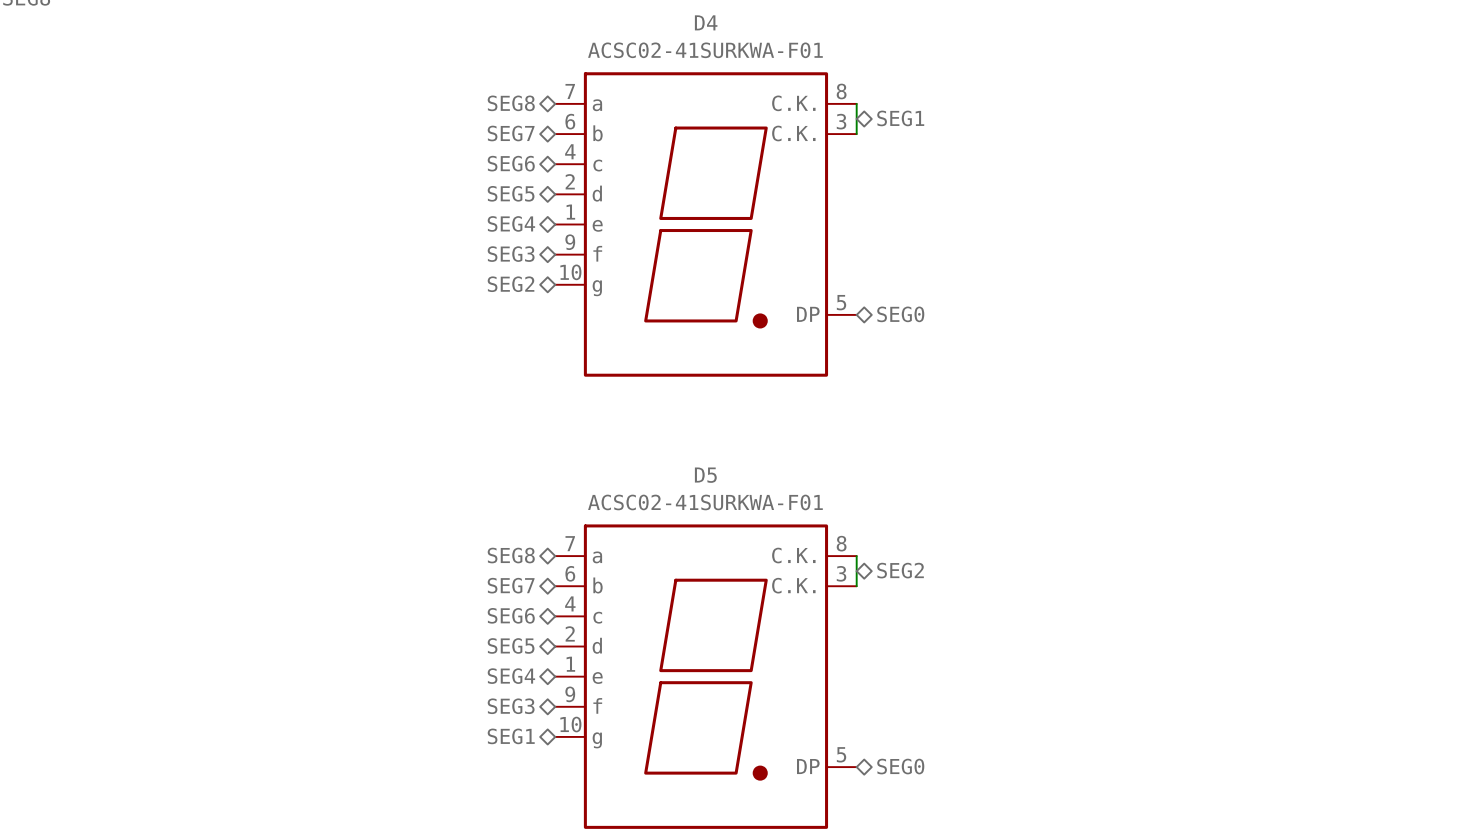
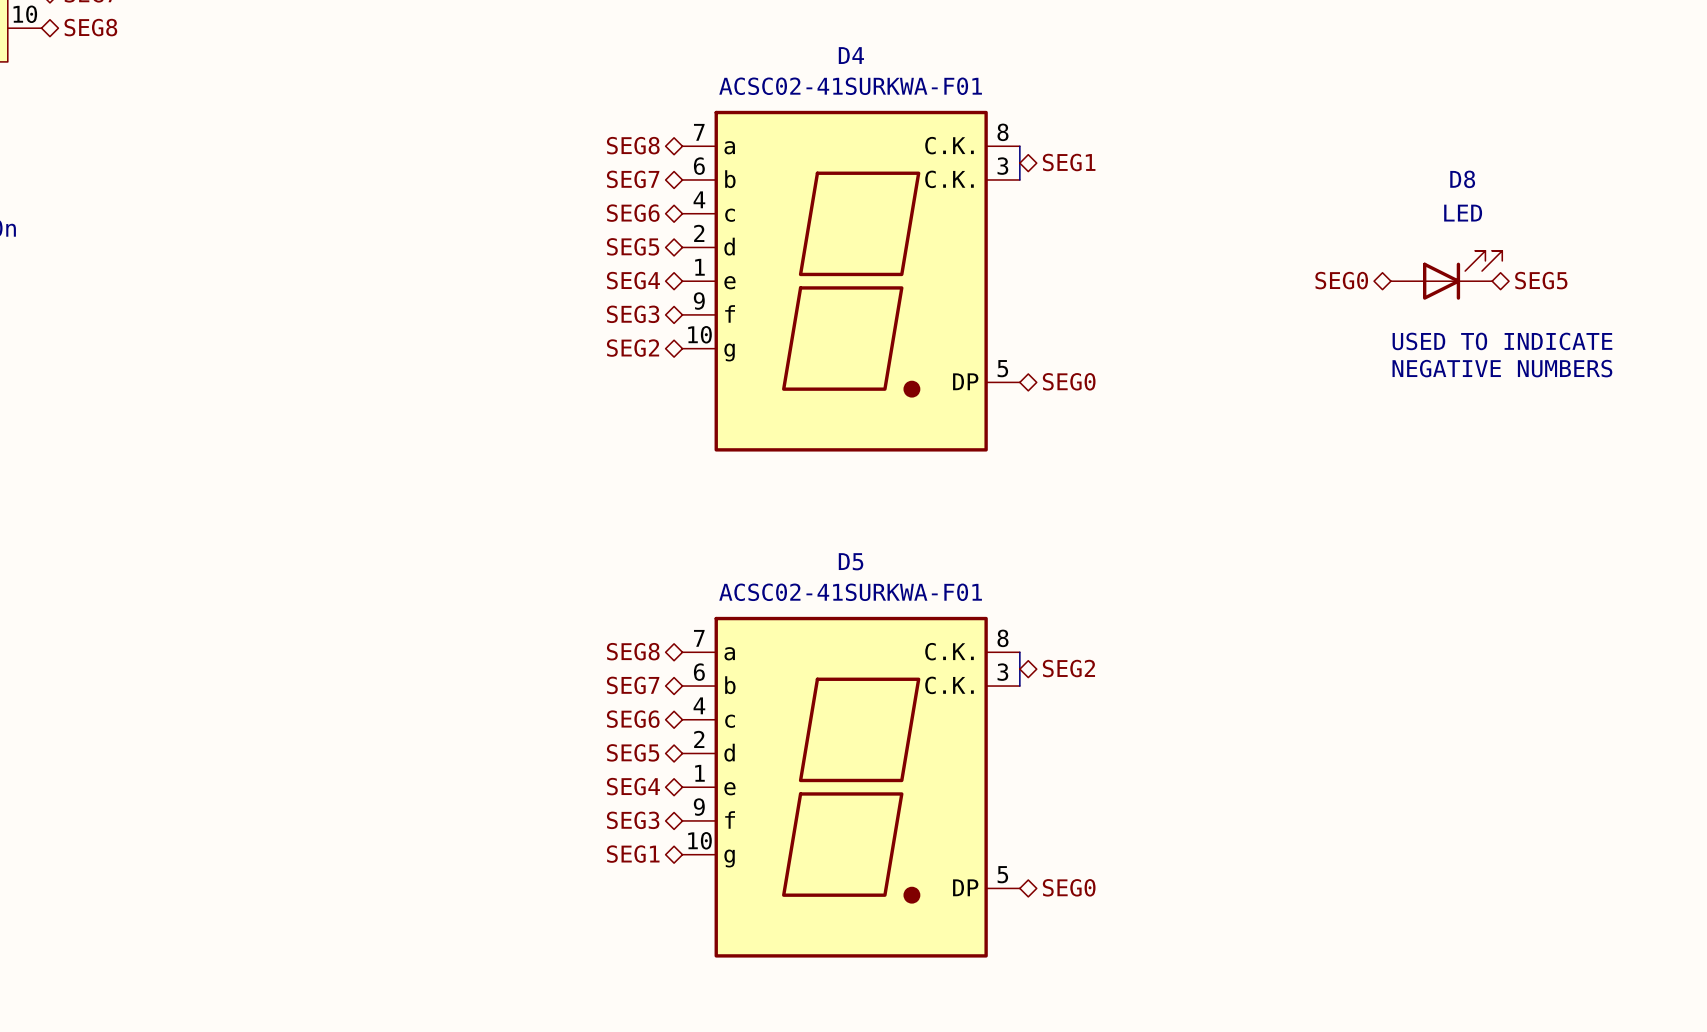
D8: none -> LED (1446, 275)
hierarchical label: none -> SEG0 (1341, 280)
hierarchical label: none -> SEG5 (1541, 280)
text: none -> USED TO INDICATE (1502, 341)
text: none -> NEGATIVE NUMBERS (1502, 368)

